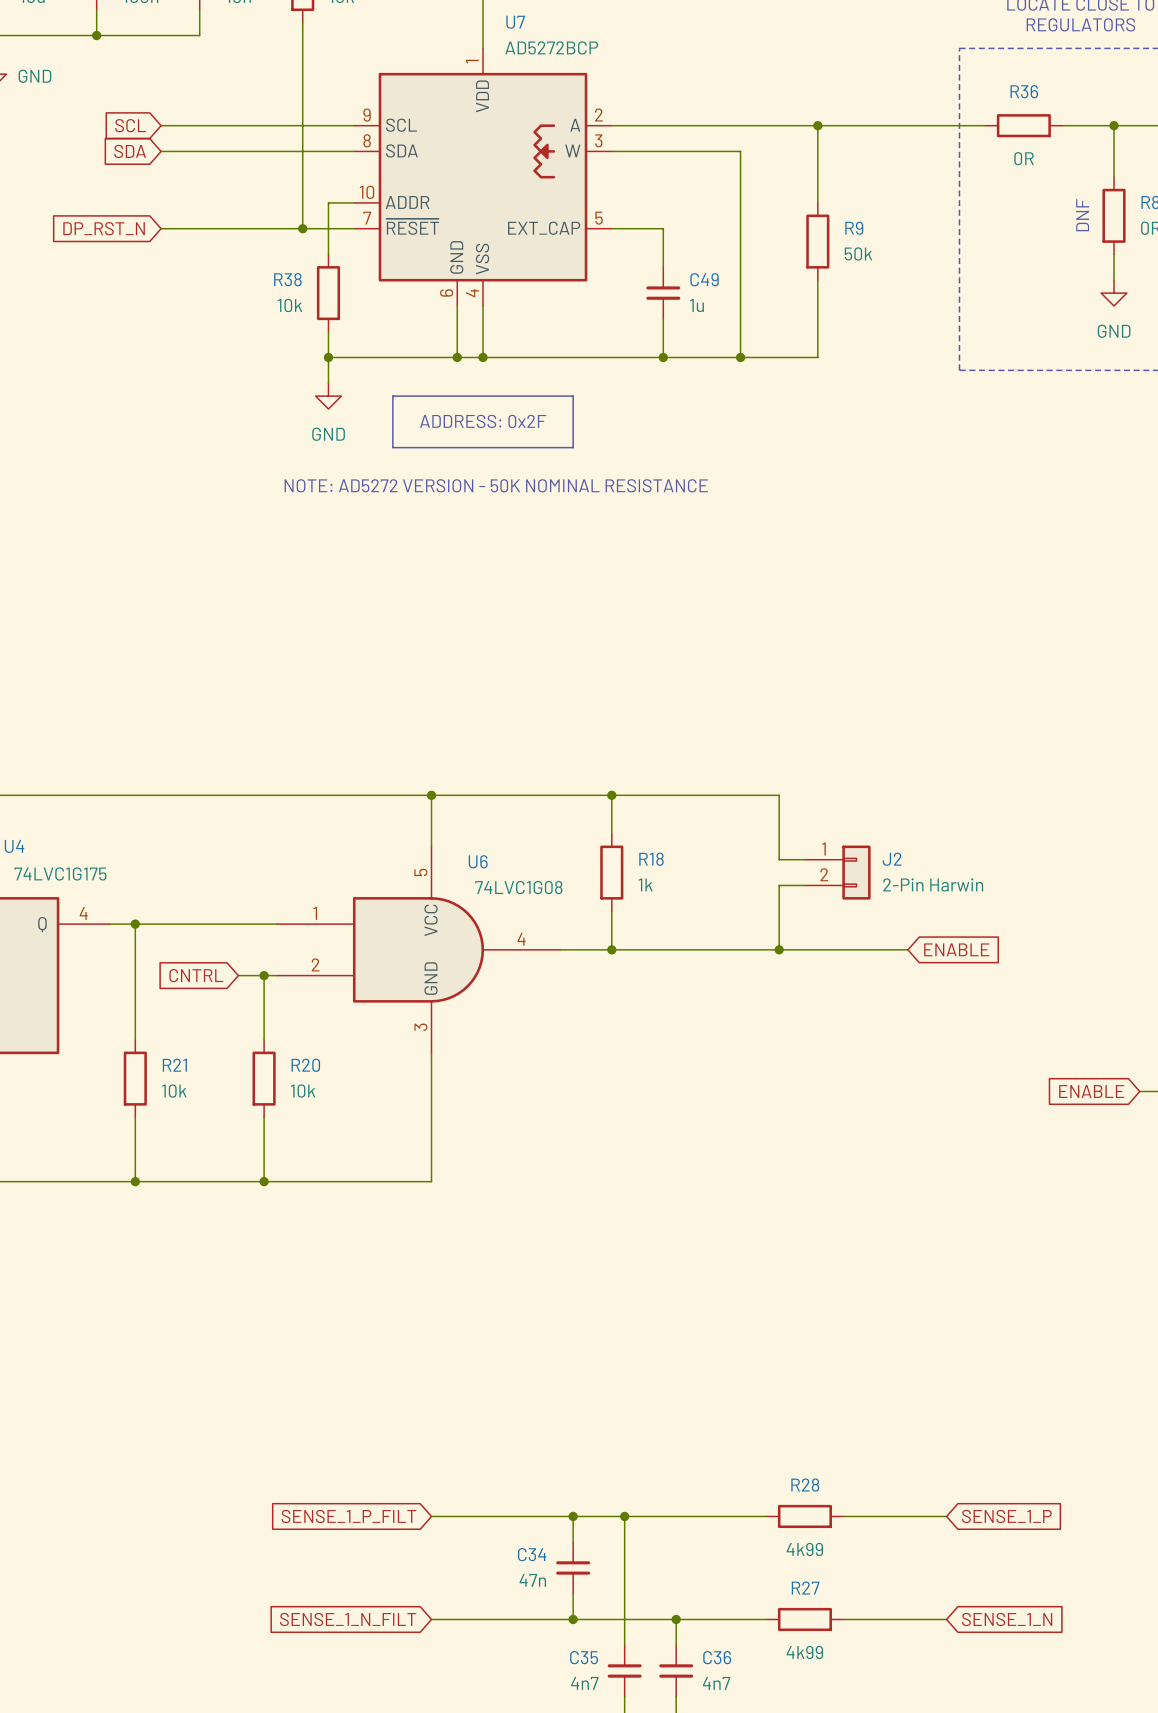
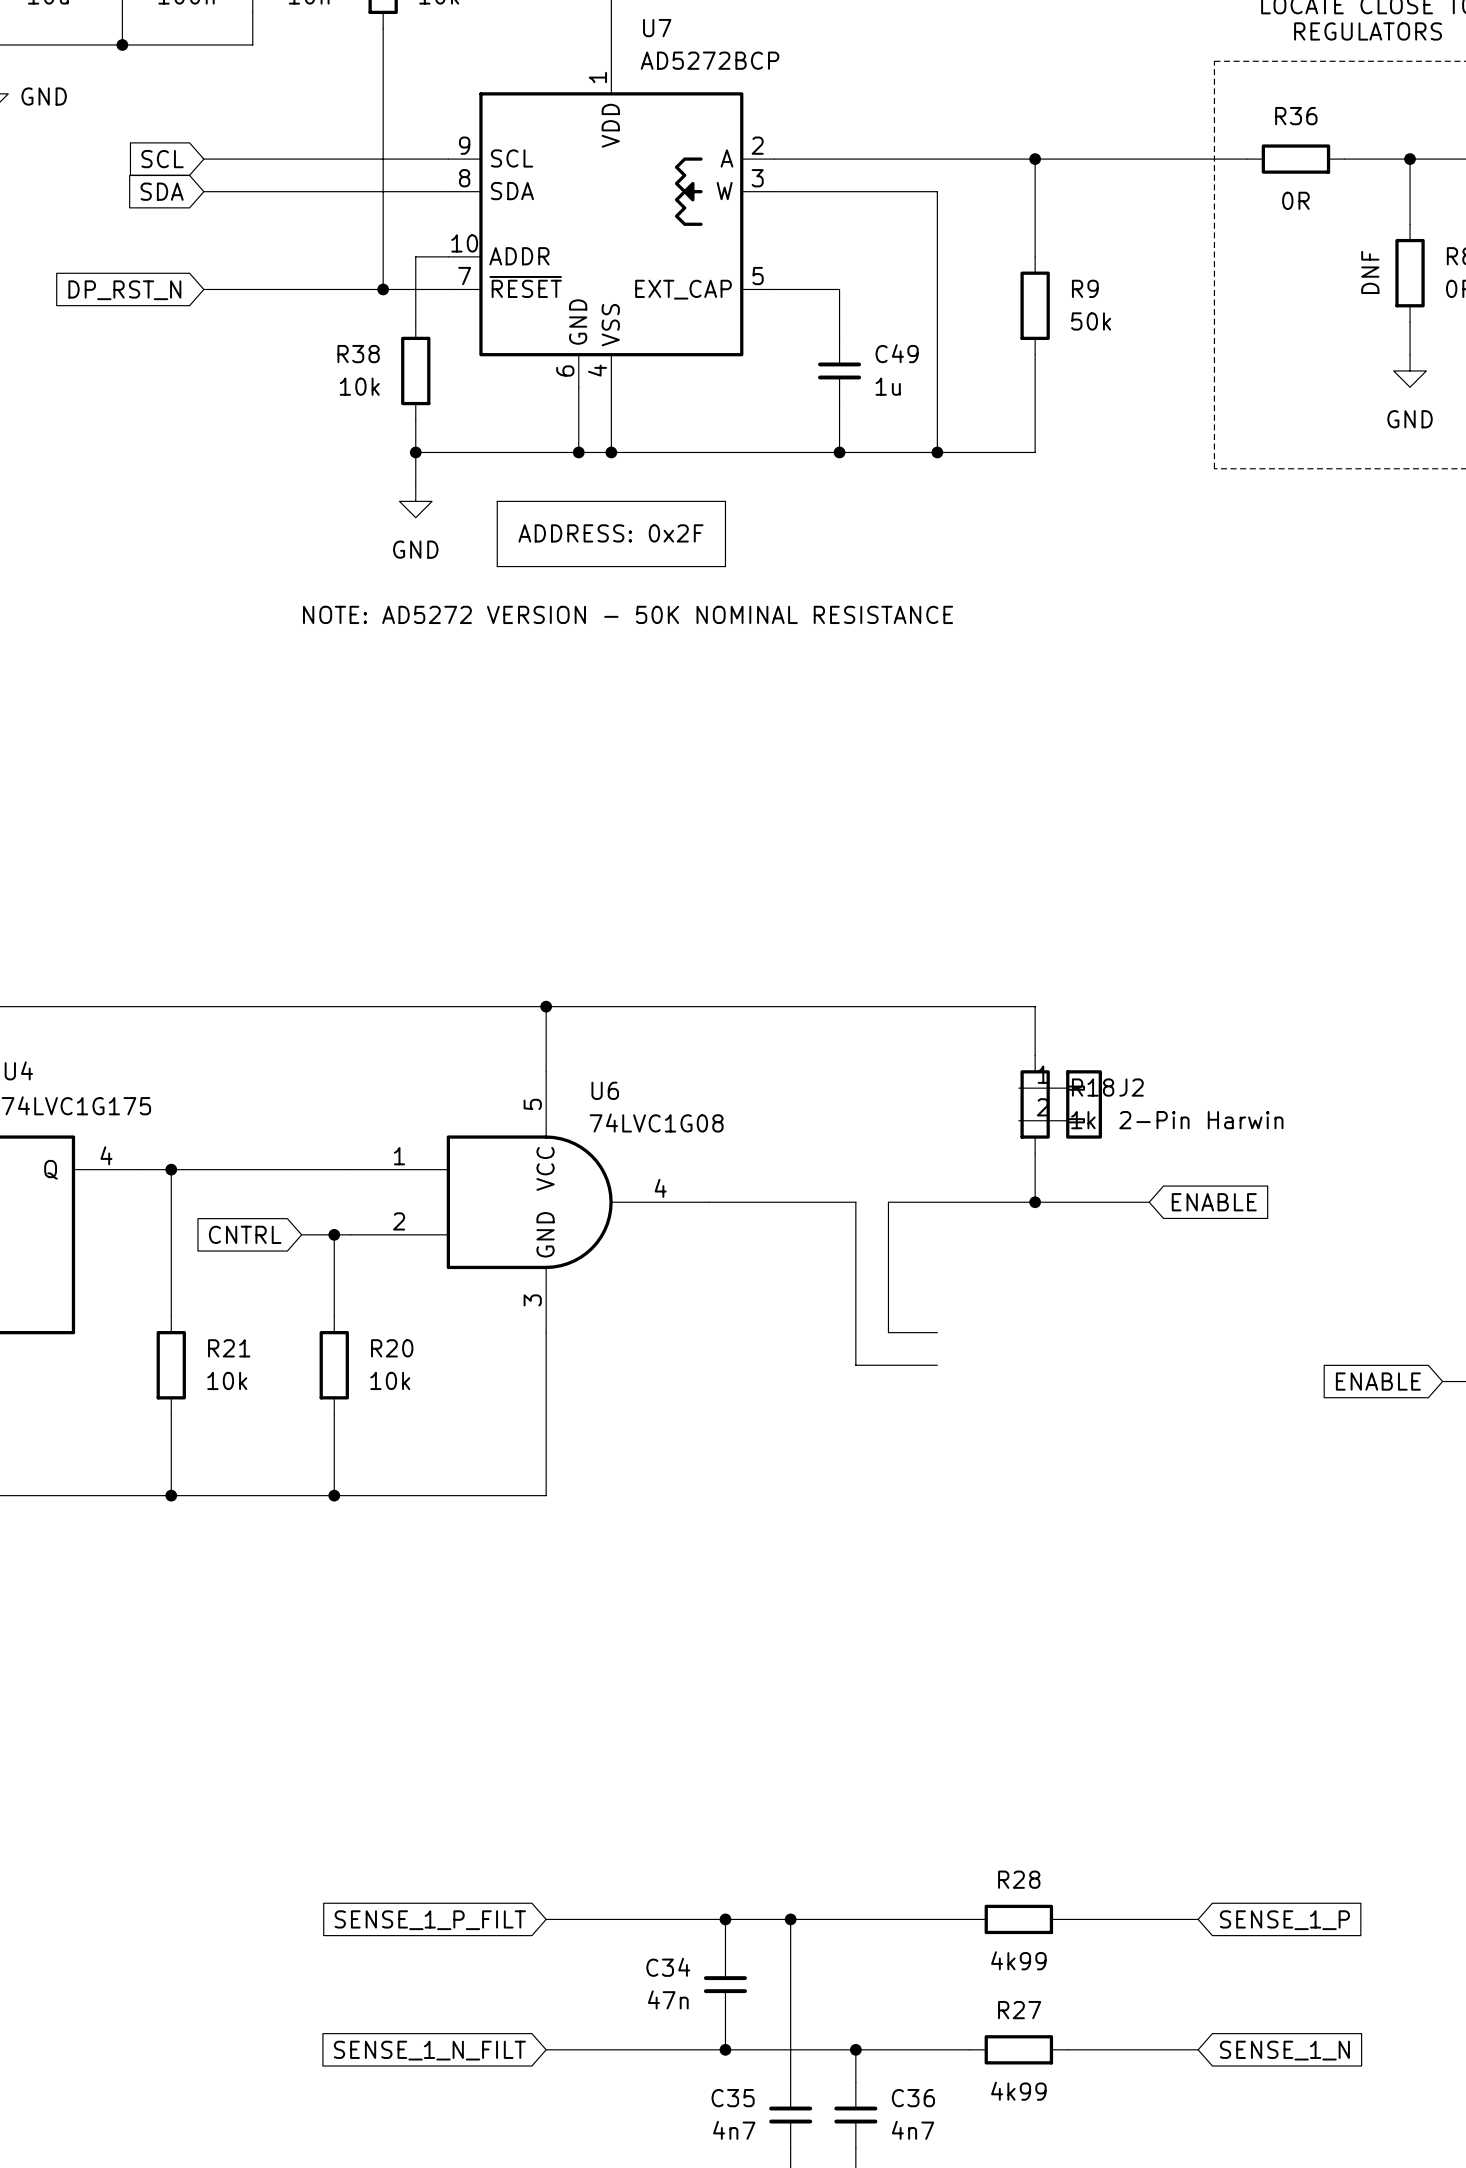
wire: (611, 795) (611, 833) -> none
junction: (611, 795) -> none
wire: (779, 795) (779, 859) (804, 859) -> (986, 1006) (1035, 1006) (1035, 1055)
R18 position: (611, 872) -> (1035, 1104)
wire: (804, 885) (779, 885) (779, 949) -> none
wire: (611, 911) (611, 949) -> (1035, 1153) (1035, 1202)
junction: (611, 949) -> none
wire: (676, 949) (701, 949) -> (937, 1332) (888, 1332) (888, 1202)
wire: none -> (855, 1202) (855, 1365) (937, 1365)
junction position: (779, 949) -> (1035, 1202)

